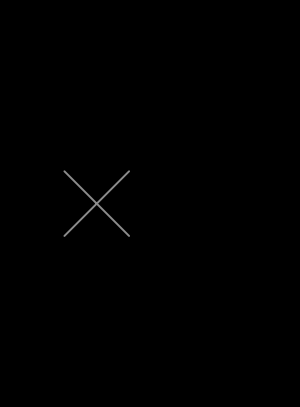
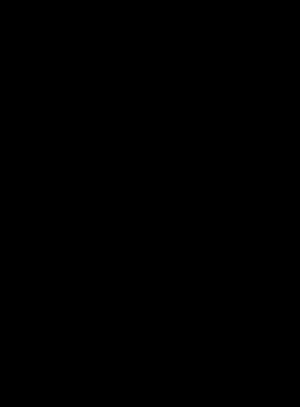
no-connect mark: (96, 203) -> none

